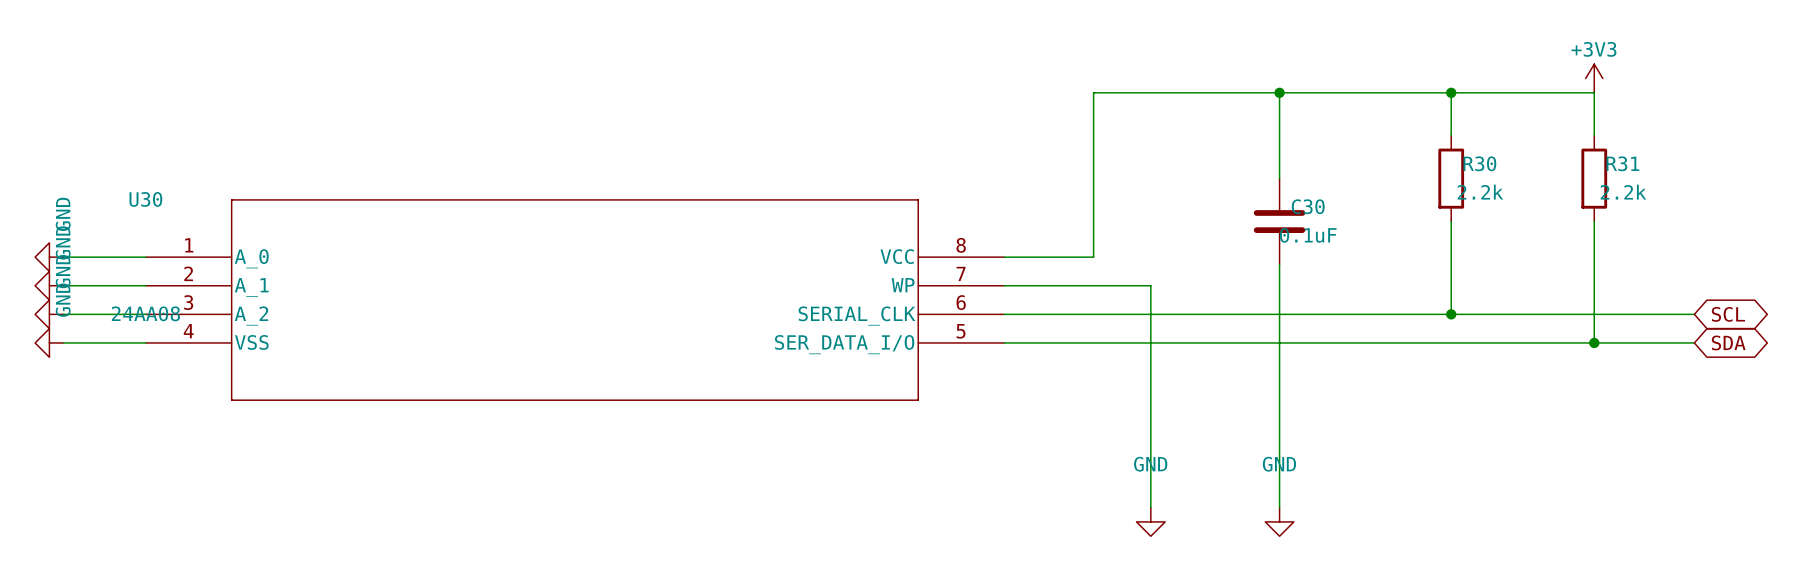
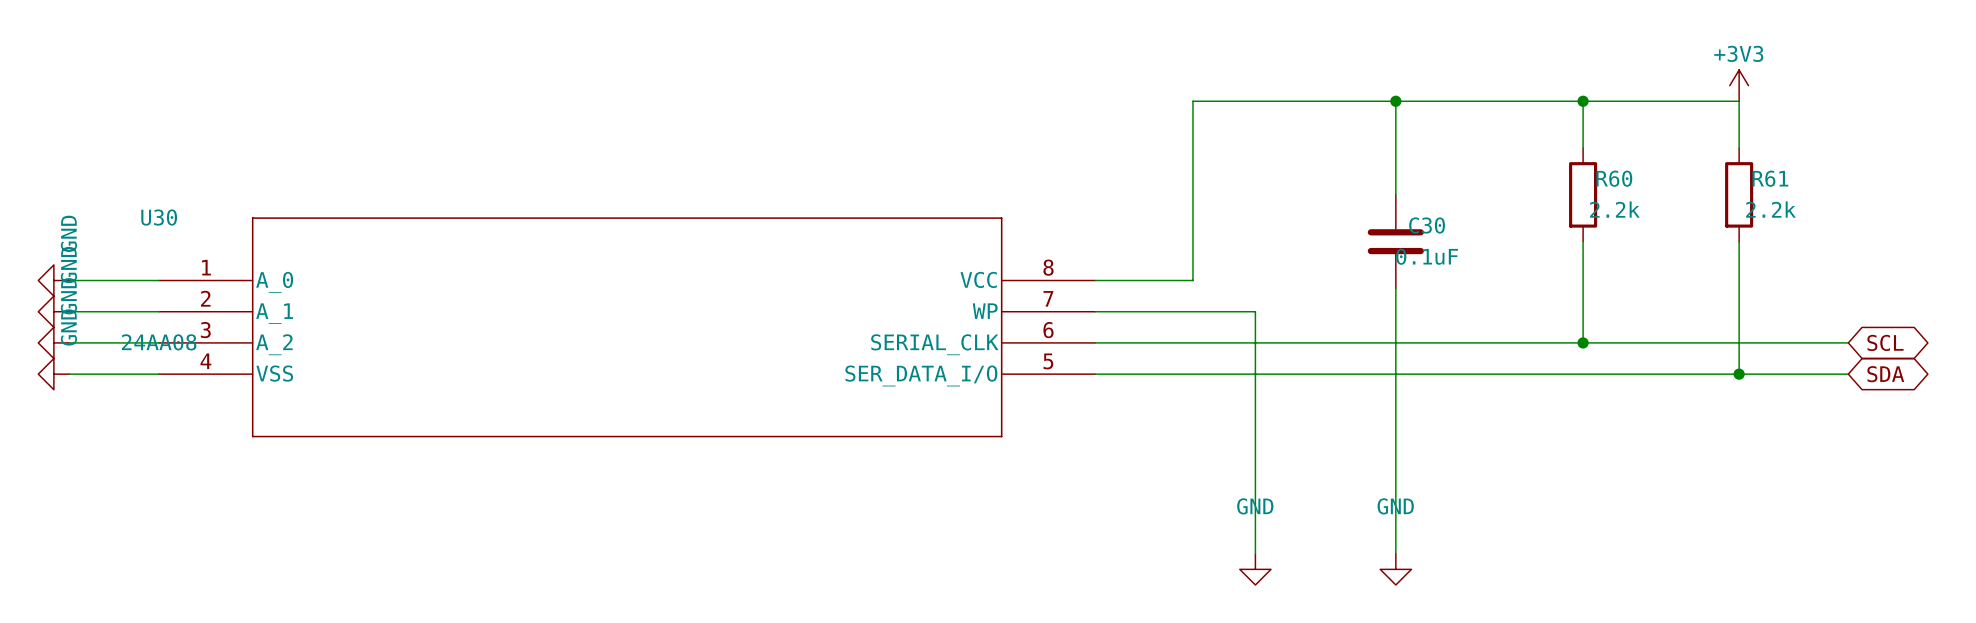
R30 name: R30 (1479, 163) -> R60 (1614, 178)
R31 name: R31 (1622, 163) -> R61 (1770, 178)

